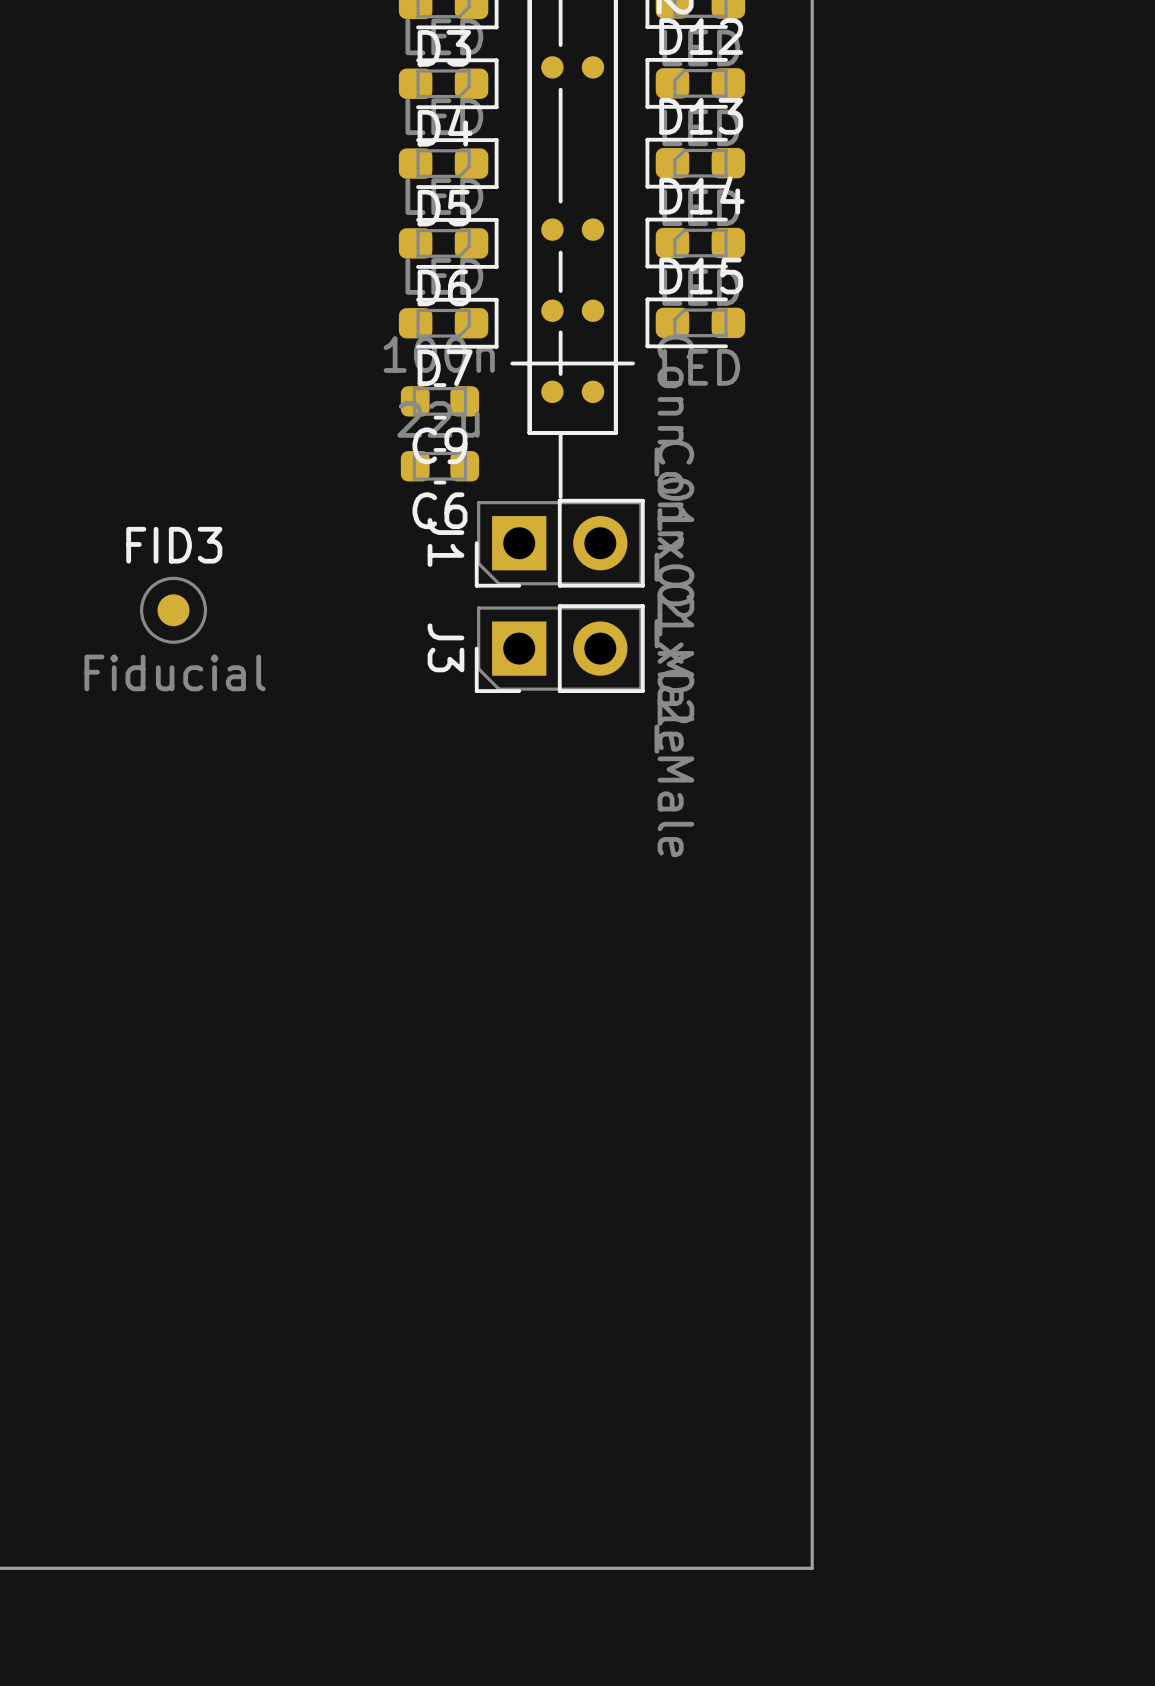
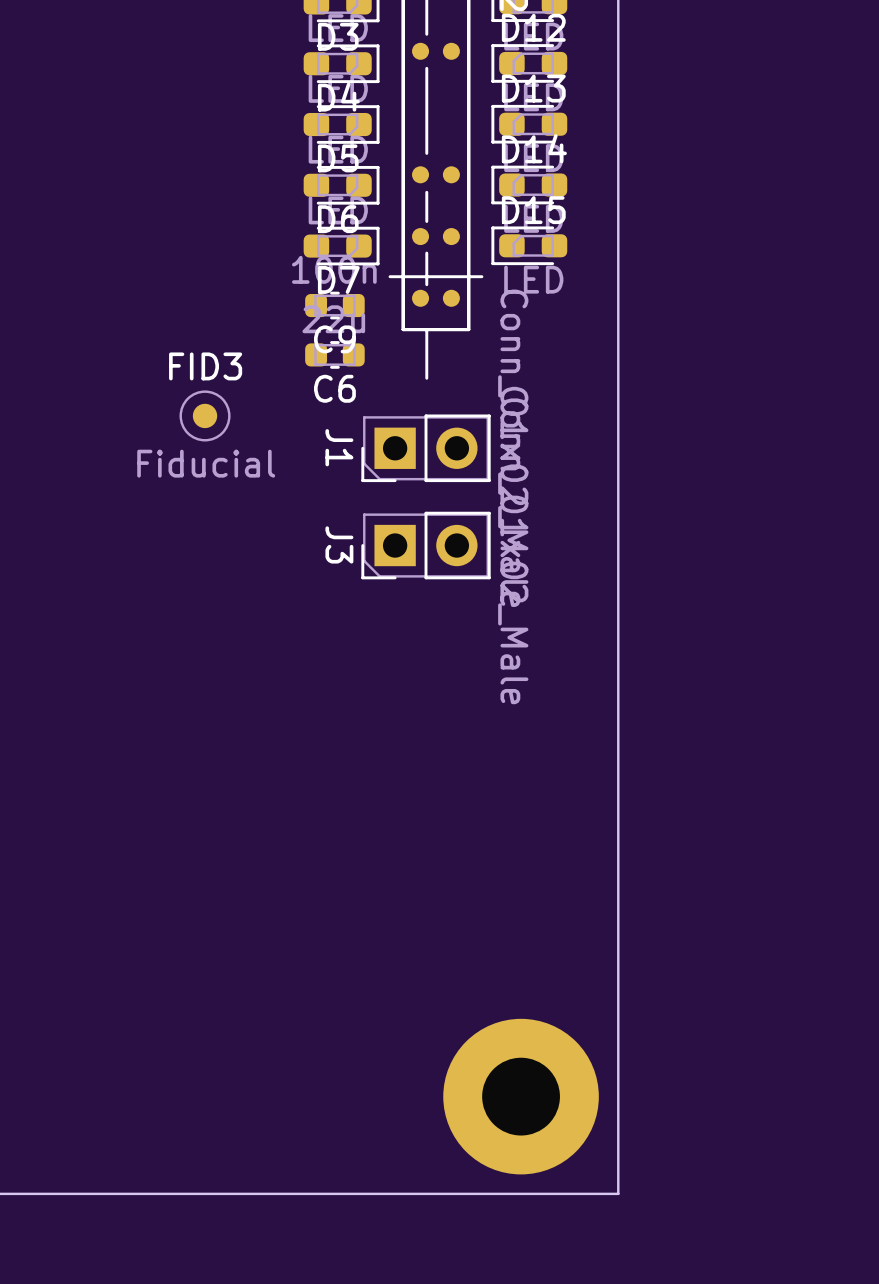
J1 position: (559, 543) -> (426, 448)
FID3 position: (173, 610) -> (205, 415)
J3 position: (559, 648) -> (426, 545)
part: none -> (521, 1096)

